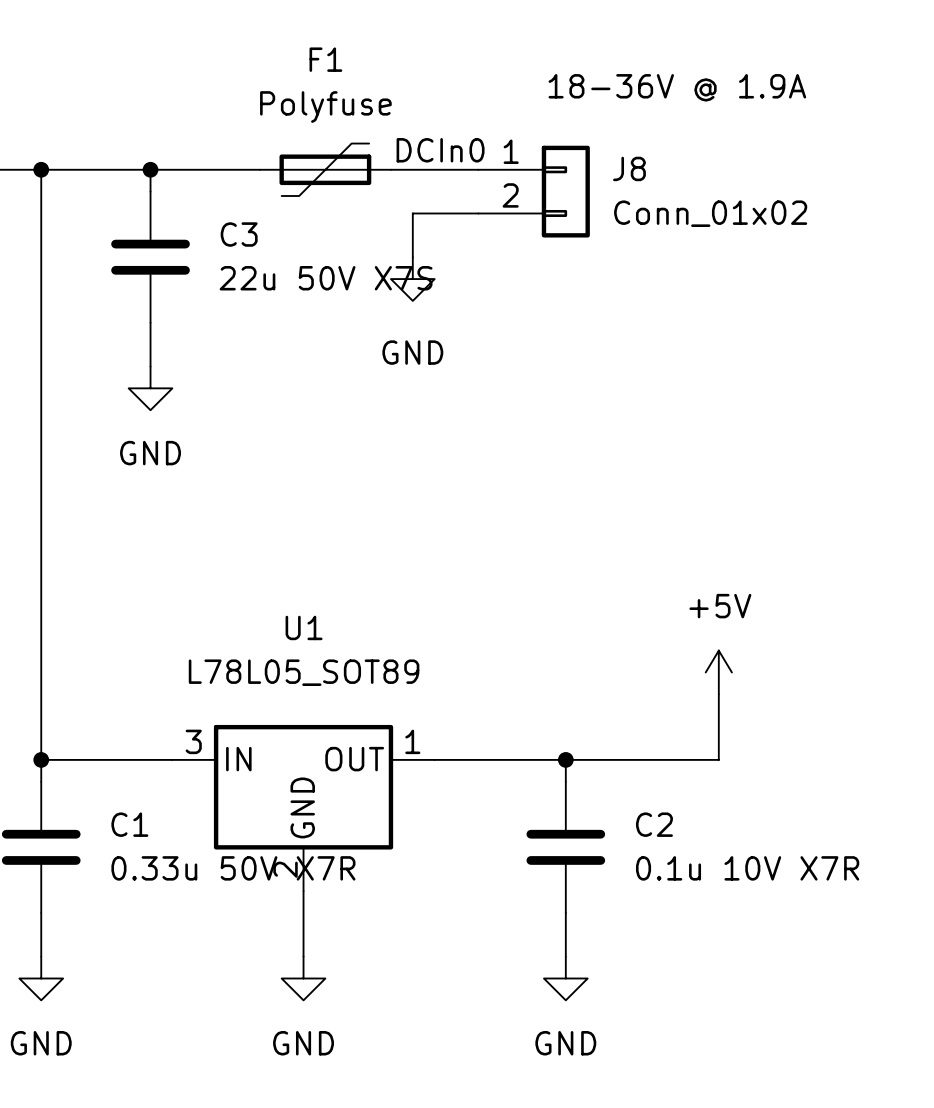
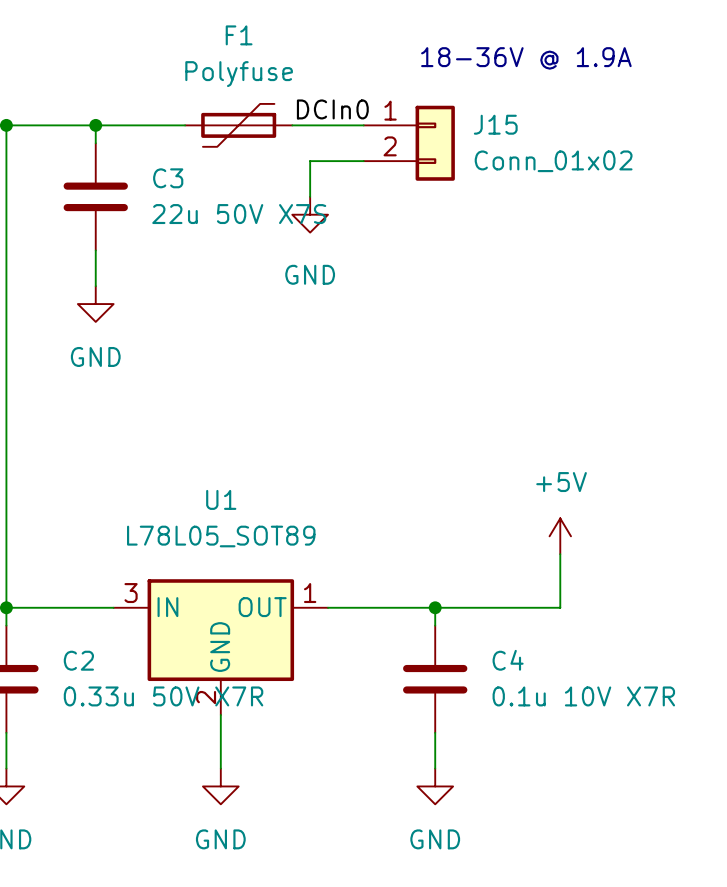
J8 name: J8 (629, 168) -> J15 (495, 124)
C1 name: C1 (129, 824) -> C2 (78, 660)
C2 name: C2 (654, 824) -> C4 (508, 660)

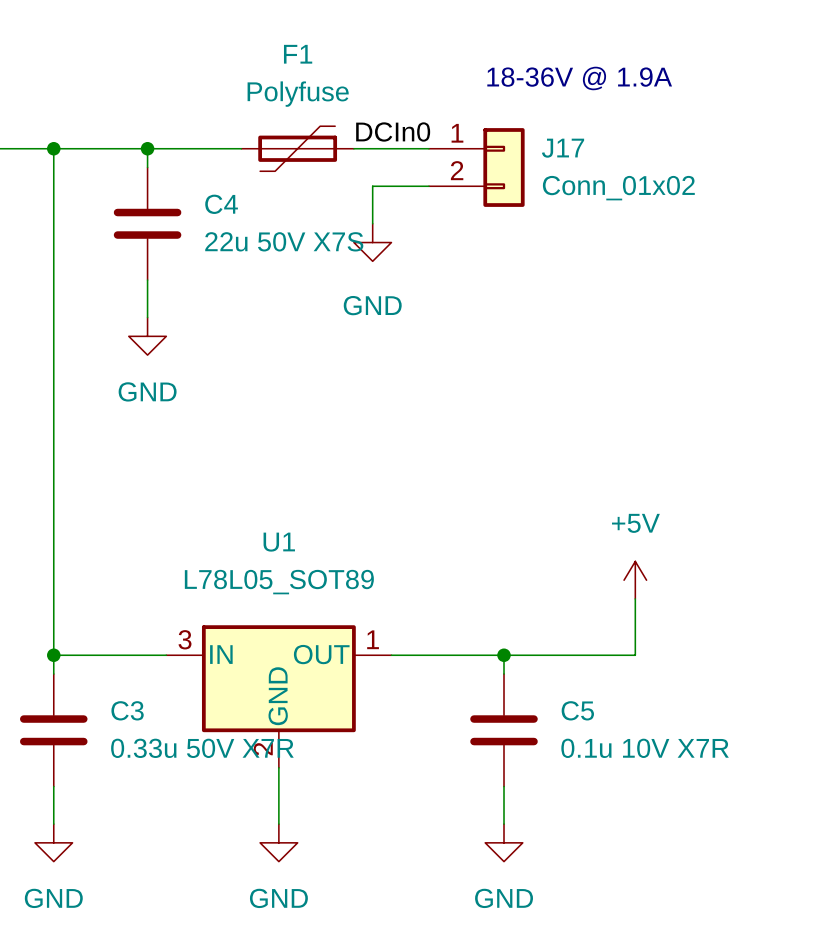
J15 name: J15 (495, 124) -> J17 (563, 148)
C3 name: C3 (168, 178) -> C4 (221, 204)
C2 name: C2 (78, 660) -> C3 (127, 710)
C4 name: C4 (508, 660) -> C5 (577, 710)

